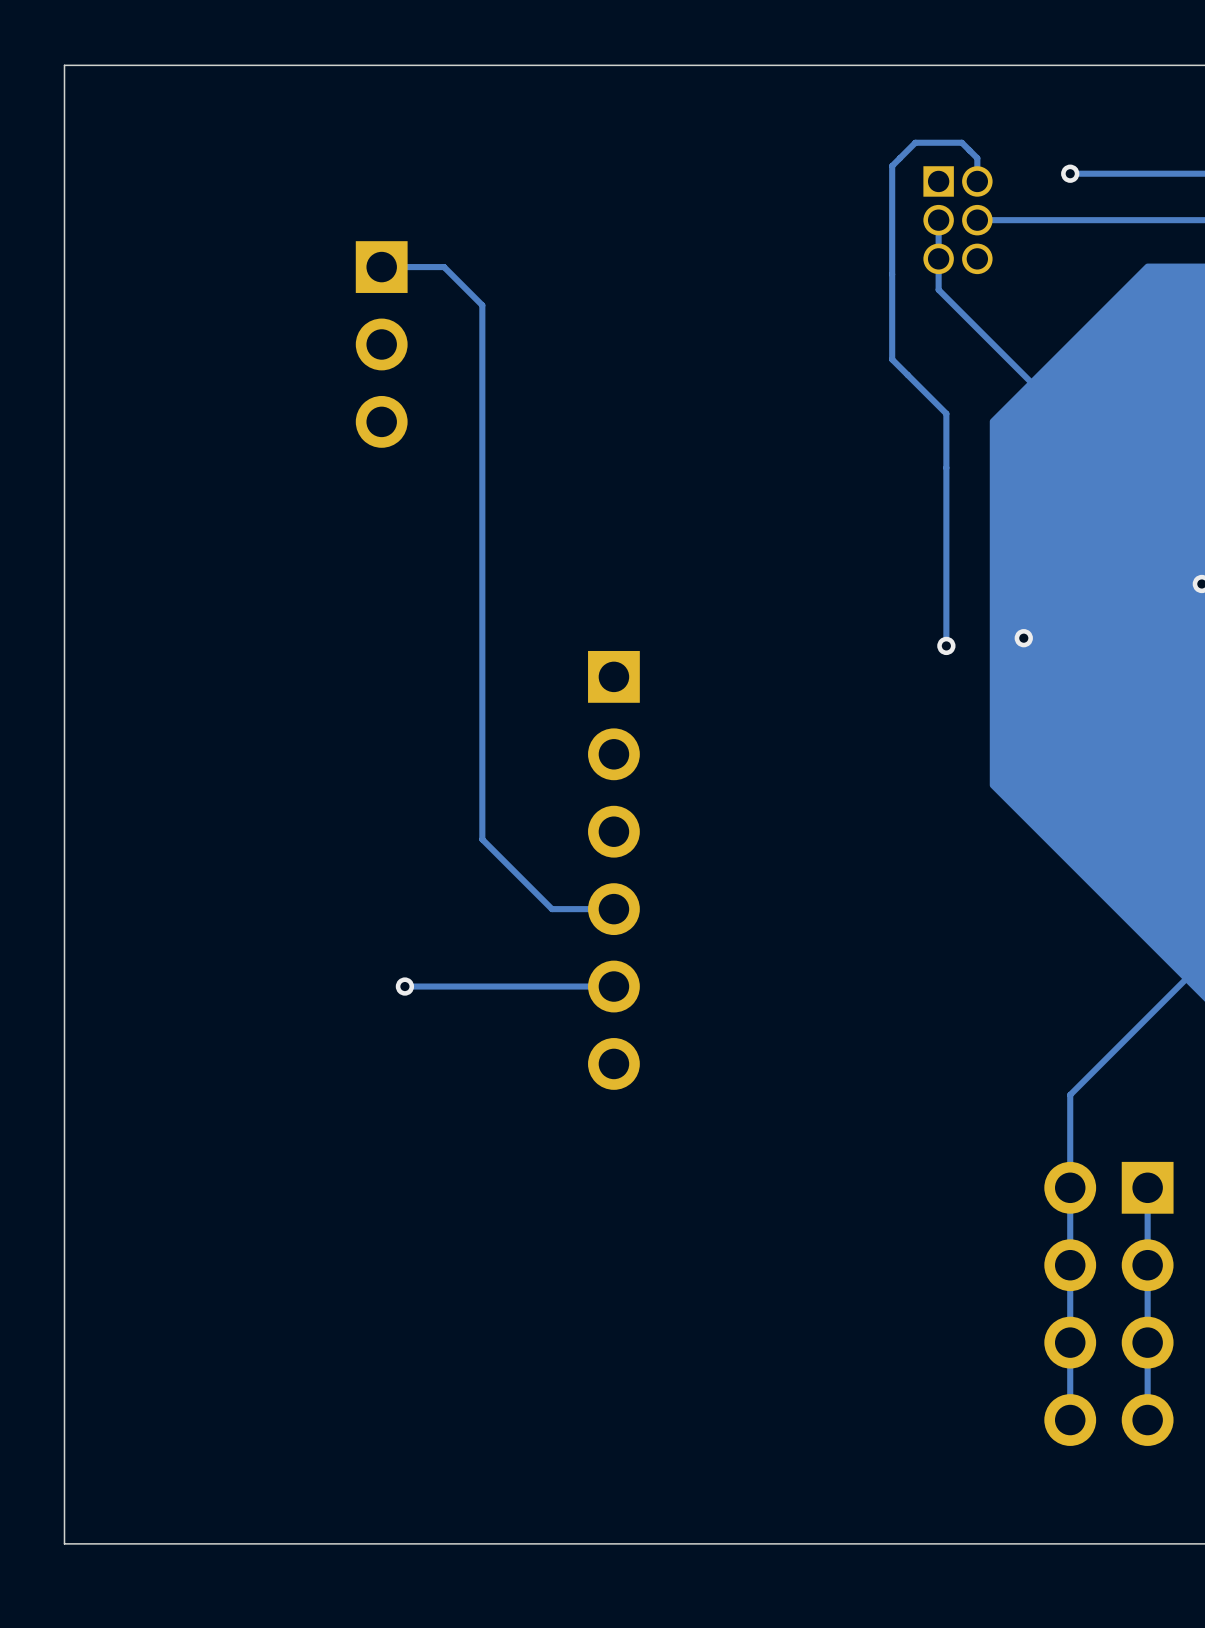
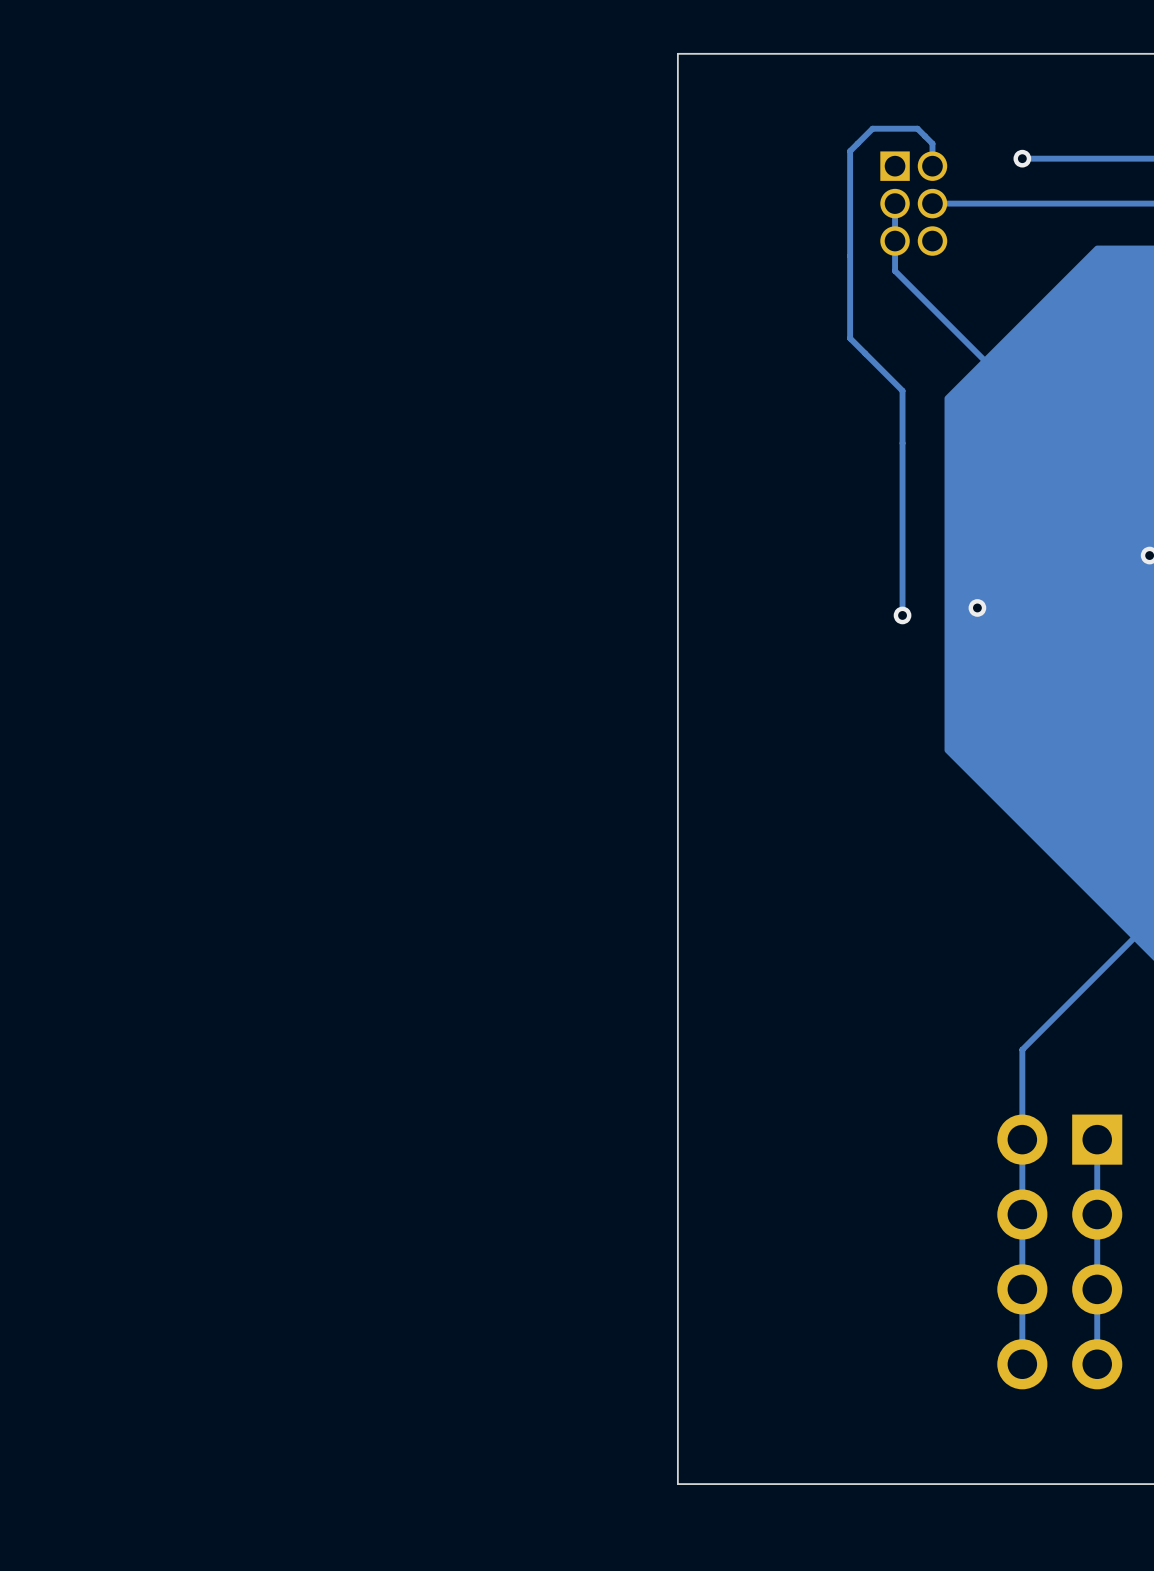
board edge: (714, 65) (64, 65) (64, 1543) (714, 1543) -> (677, 53) (677, 1484)
track: (381, 267) (444, 267) (482, 305) (482, 839) (552, 909) (613, 909) -> none
part: (381, 344) -> none
part: (613, 870) -> none
via: (404, 986) -> none
track: (613, 986) (404, 986) -> none

